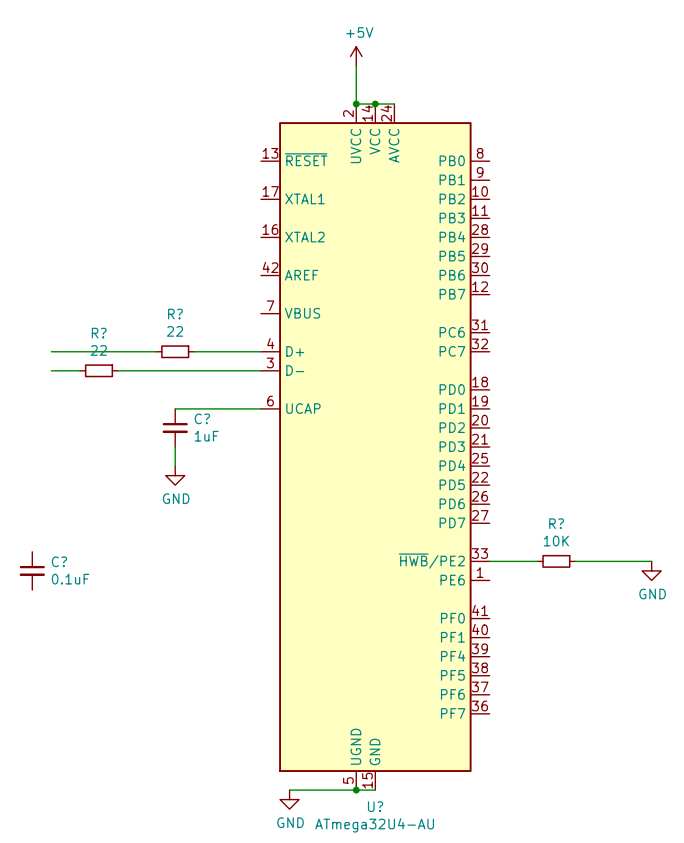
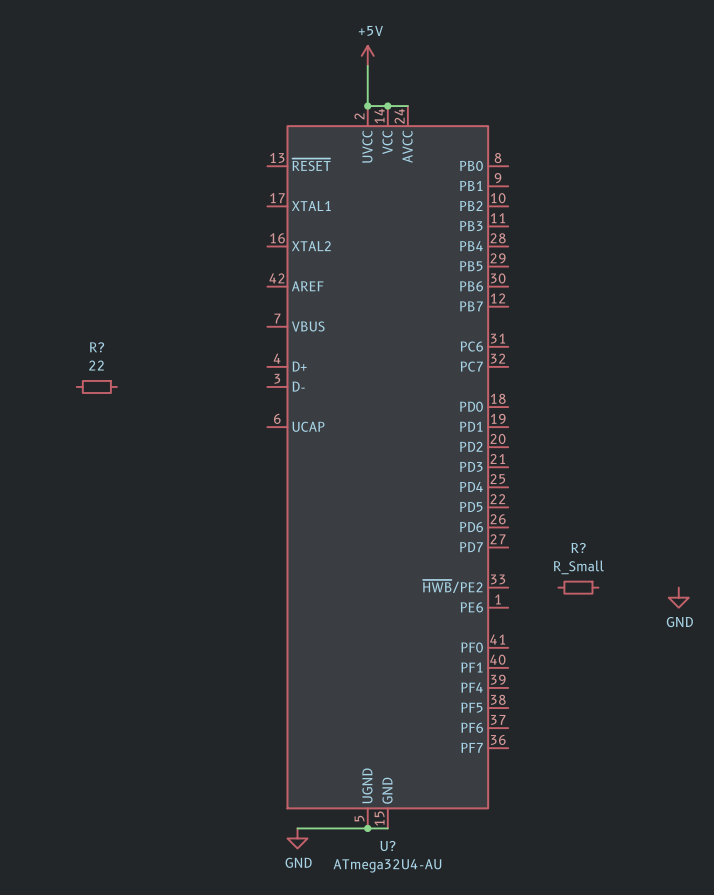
wire: (51, 351) (156, 351) -> none
R?: 22 (175, 351) -> none
wire: (194, 351) (260, 351) -> none
wire: (51, 370) (79, 370) -> none
wire: (118, 370) (260, 370) -> none
wire: (175, 408) (260, 408) -> none
C?: 1uF (175, 427) -> none
wire: (175, 447) (175, 466) -> none
power symbol: GND (175, 475) -> none
R? value: 10K (556, 541) -> R_Small (578, 567)
wire: (489, 561) (537, 561) -> none
wire: (575, 561) (651, 561) -> none
C?: 0.1uF (32, 570) -> none

